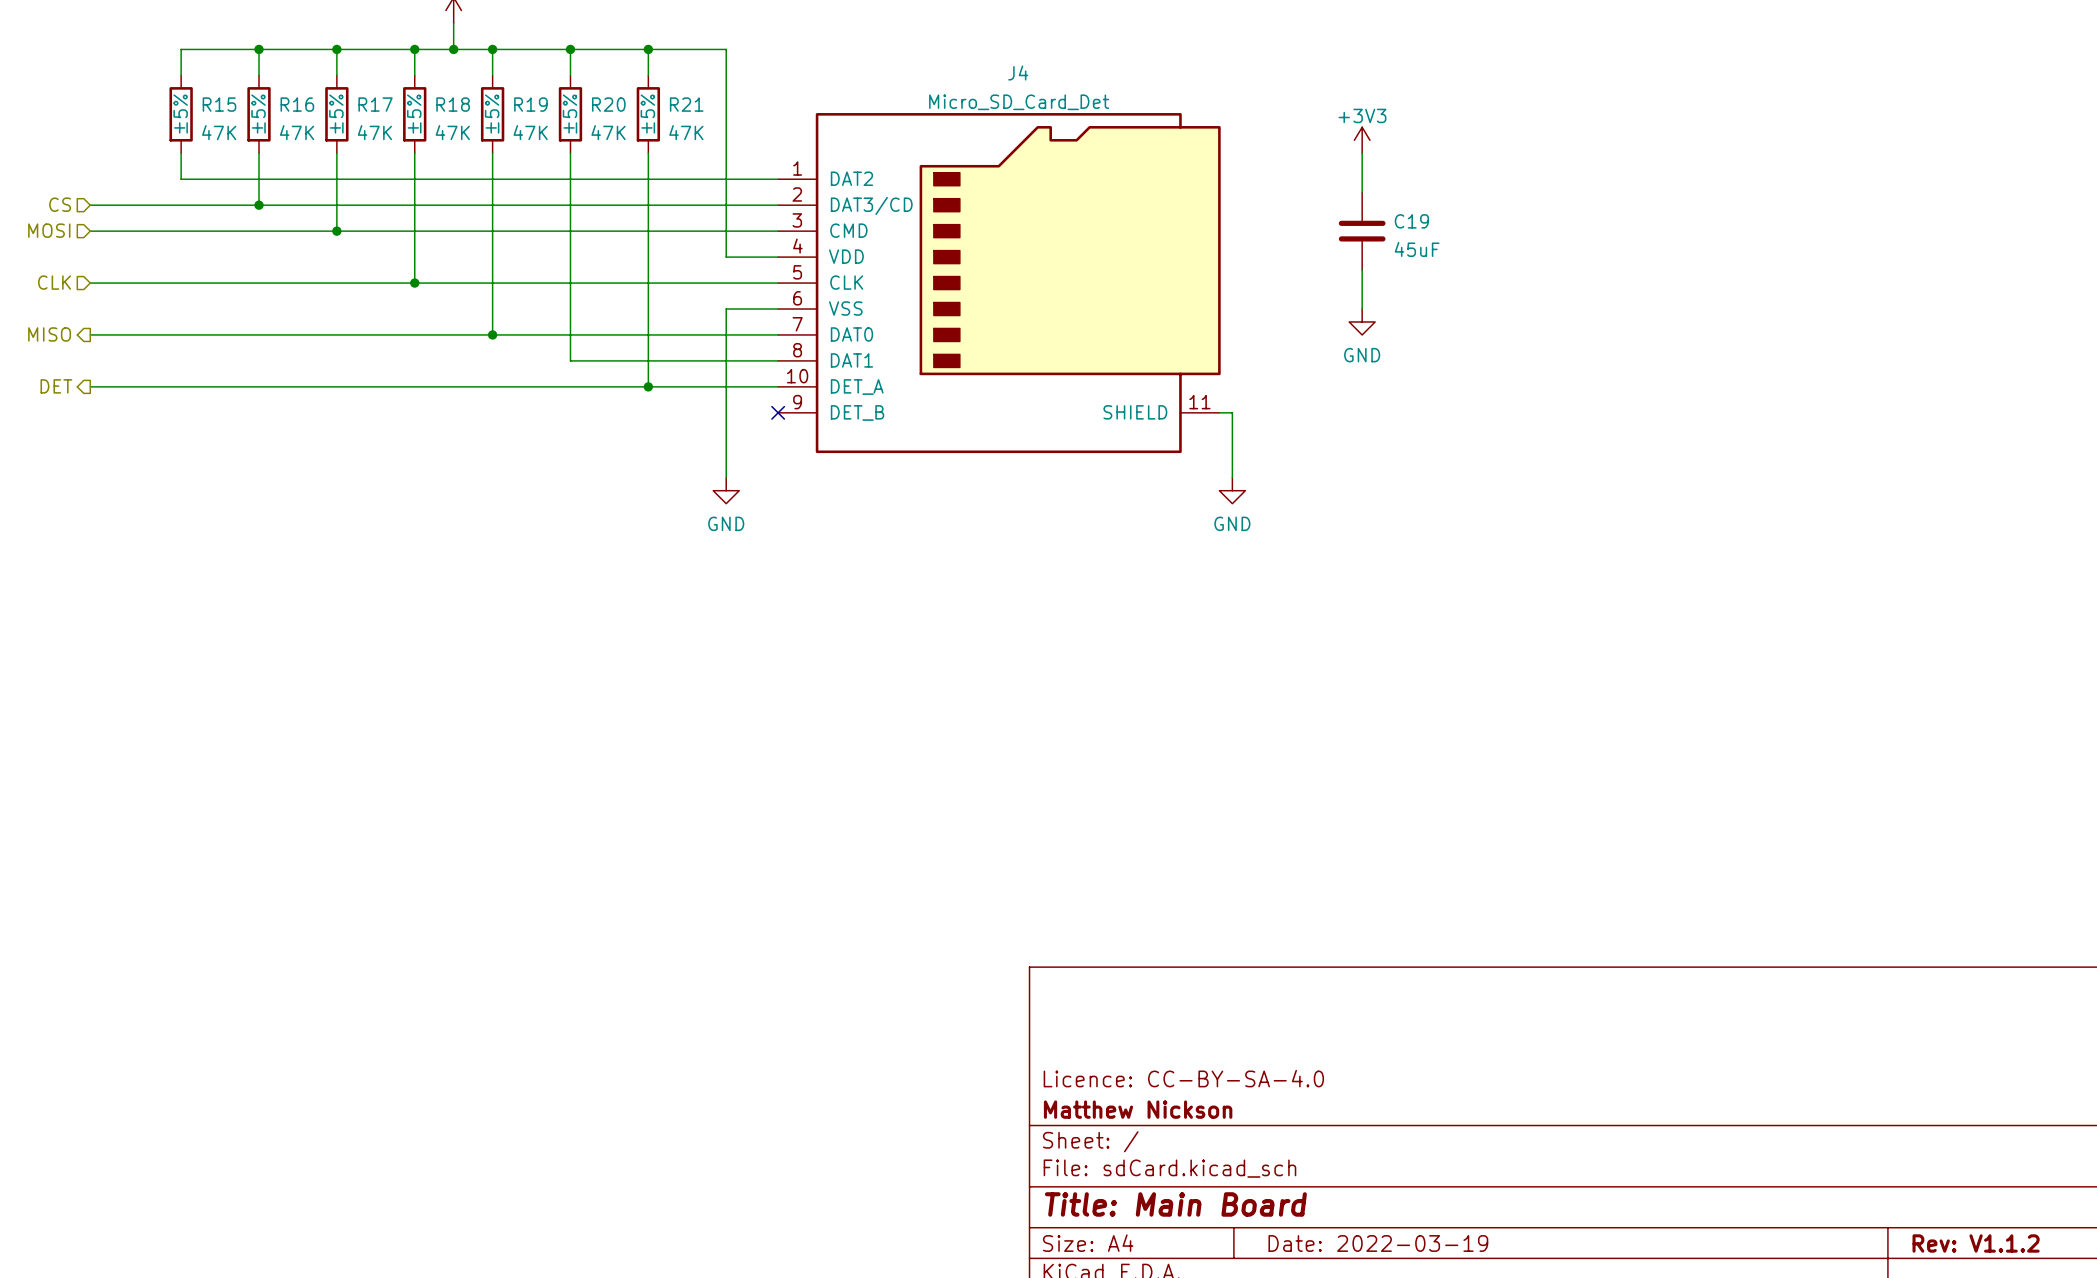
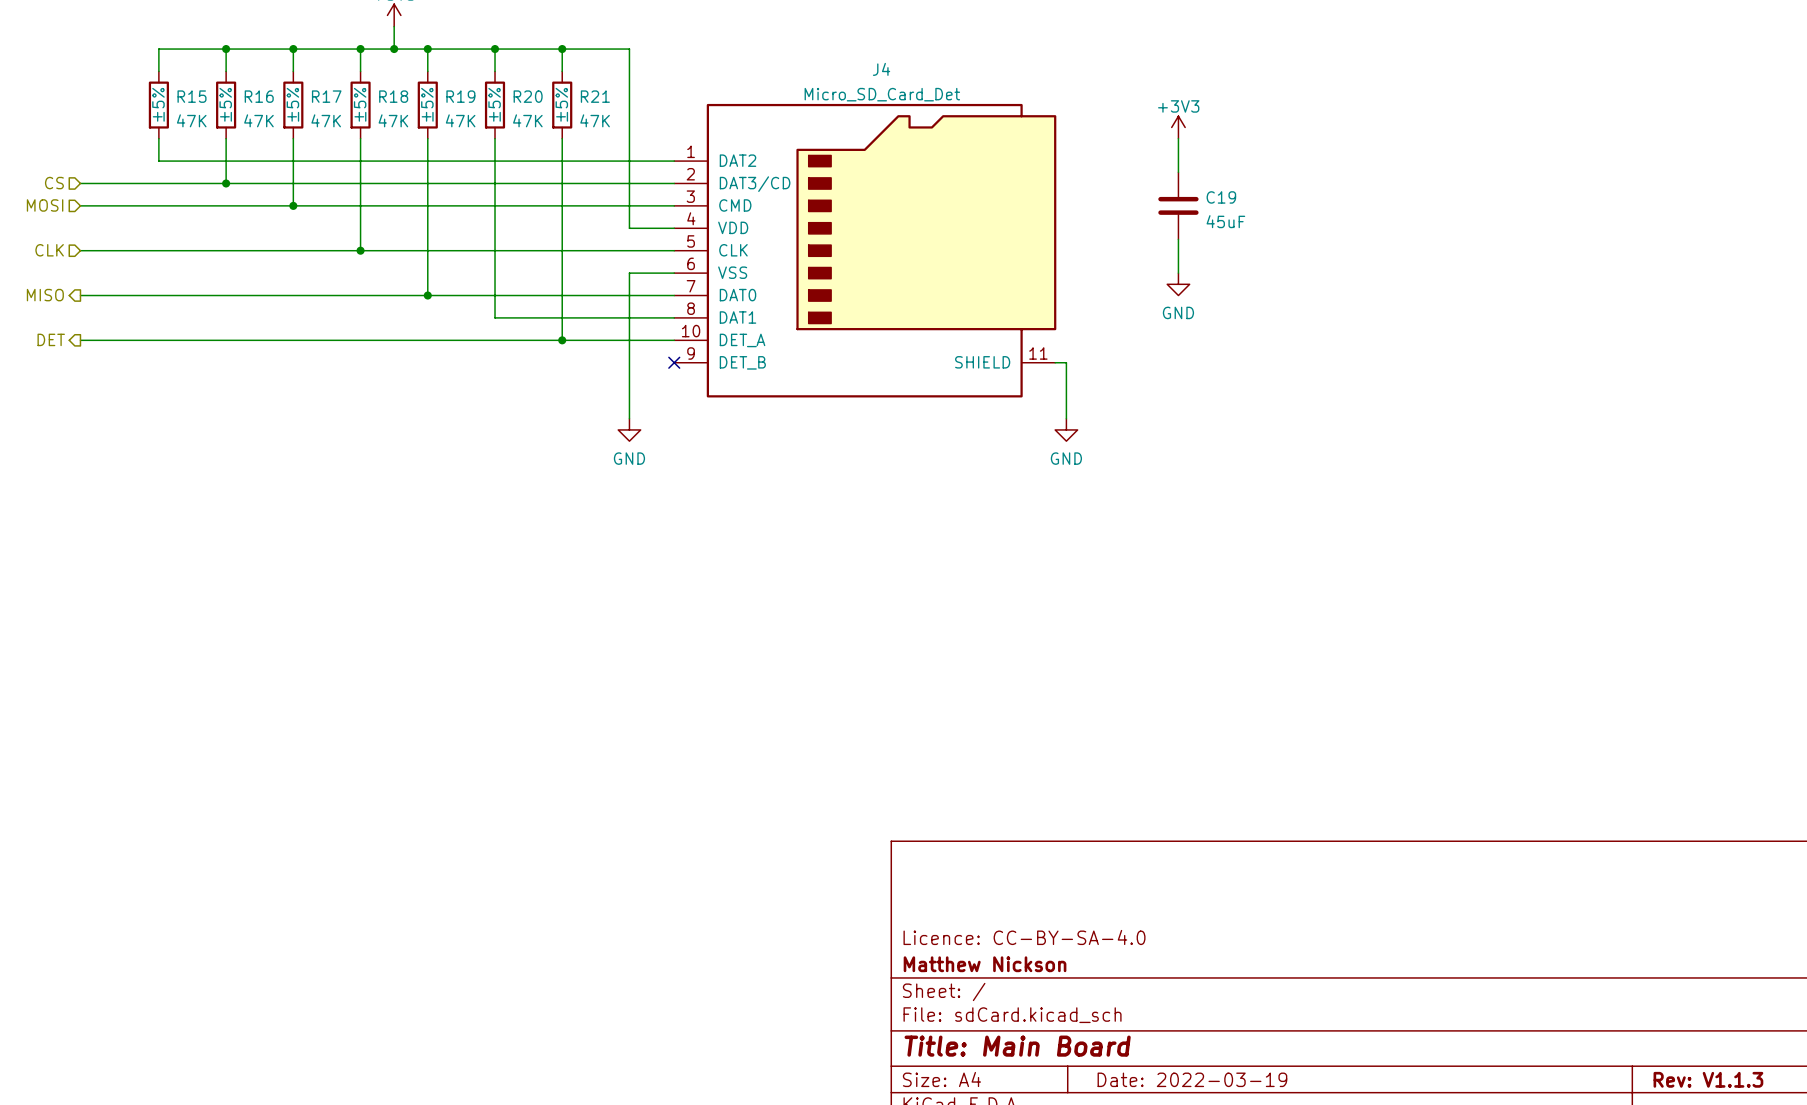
title block: Rev: V1.1.2 (1976, 1243) -> Rev: V1.1.3 (1708, 1079)

